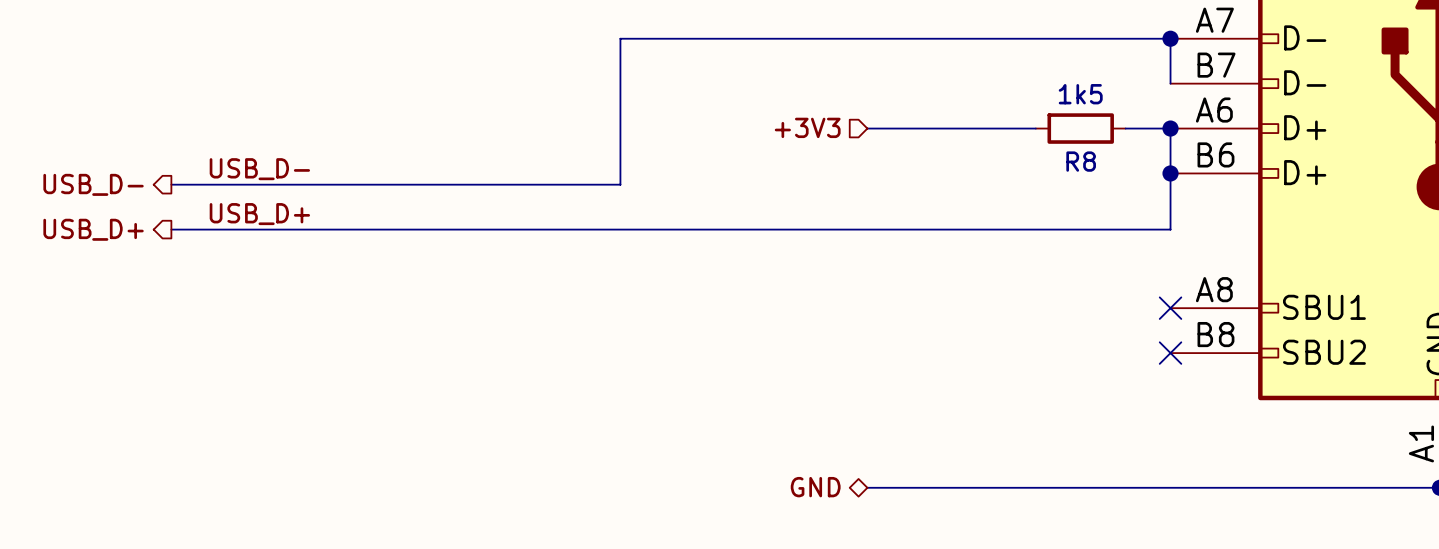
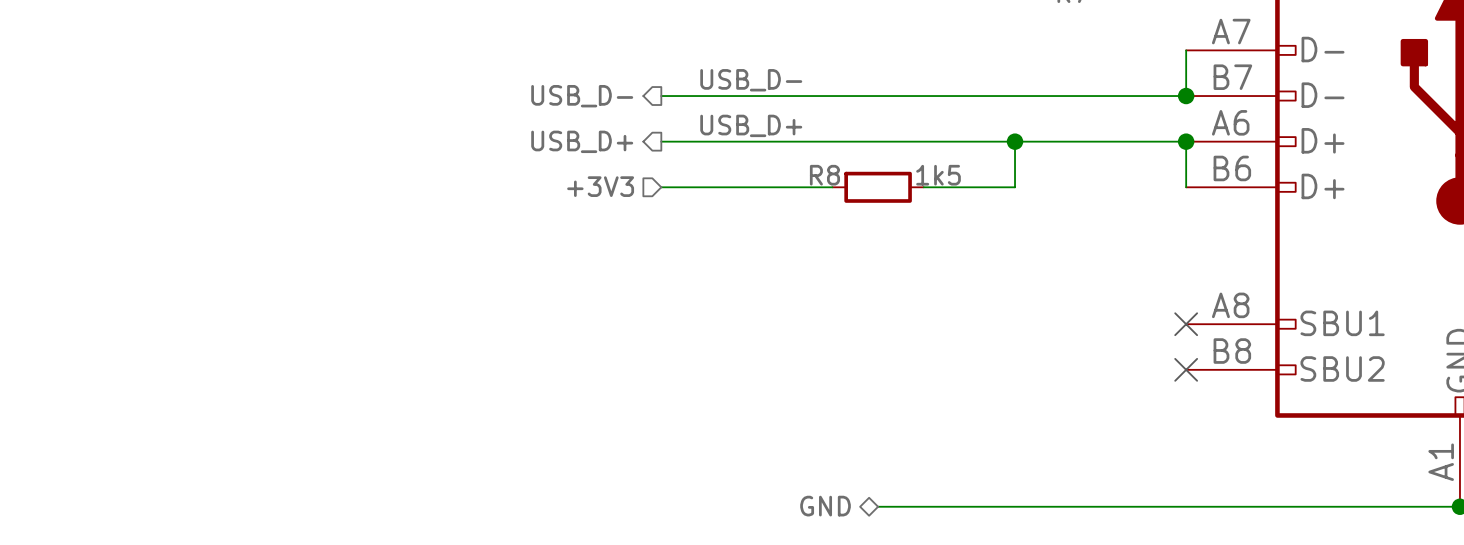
wire: (1170, 38) (620, 38) (620, 184) (171, 184) -> none
junction: (1170, 38) -> none
label: none -> USB_D- (751, 80)
hierarchical label: none -> USB_D- (582, 96)
wire: none -> (661, 96) (1186, 96)
junction: none -> (1186, 96)
R8 value position: 1k5 (1080, 94) -> 1k5 (938, 175)
label: none -> USB_D+ (751, 125)
hierarchical label position: +3V3 (807, 127) -> +3V3 (600, 186)
hierarchical label: none -> USB_D+ (582, 141)
wire: none -> (661, 141) (878, 141)
wire: none -> (1015, 141) (1015, 187) (923, 187)
junction: none -> (1015, 141)
wire: none -> (1049, 141) (1140, 141)
R8 position: (1080, 128) -> (878, 187)
R8 name position: R8 (1081, 161) -> R8 (824, 175)
label: USB_D- (259, 169) -> none
wire: none -> (661, 187) (832, 187)
wire: (1170, 173) (1170, 229) (171, 229) -> none
junction: (1170, 173) -> none
hierarchical label: USB_D- (93, 184) -> none
label: USB_D+ (259, 214) -> none
hierarchical label: USB_D+ (93, 229) -> none

